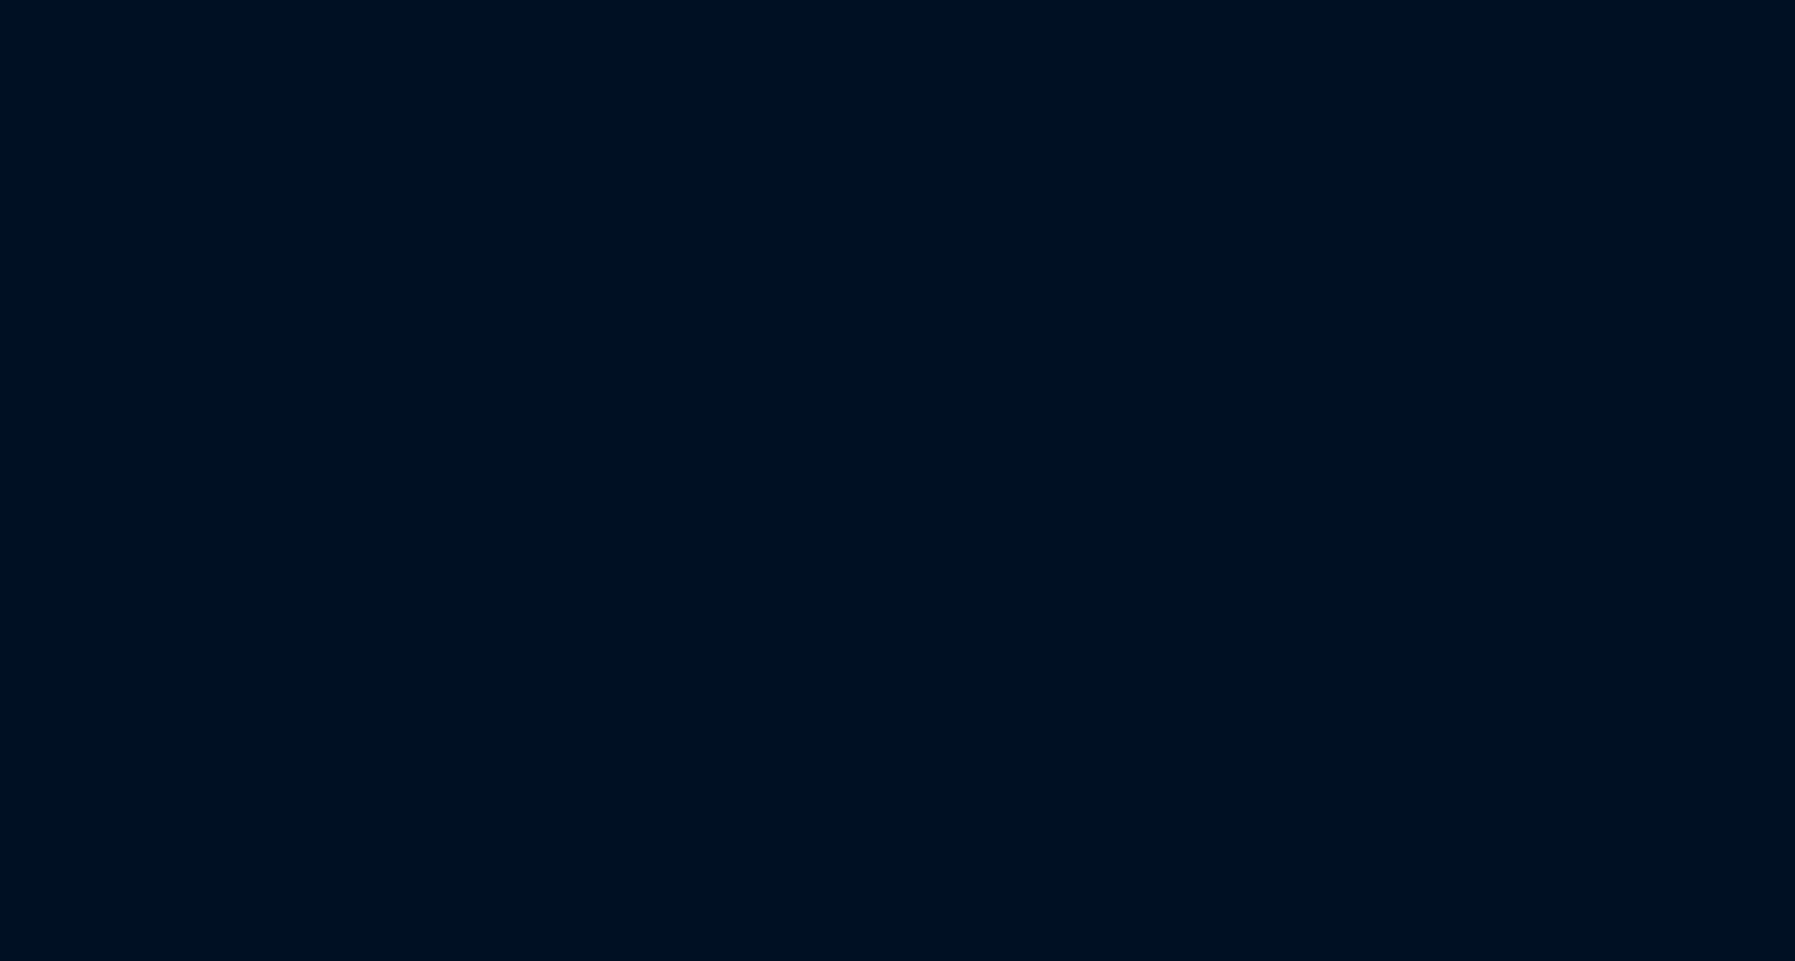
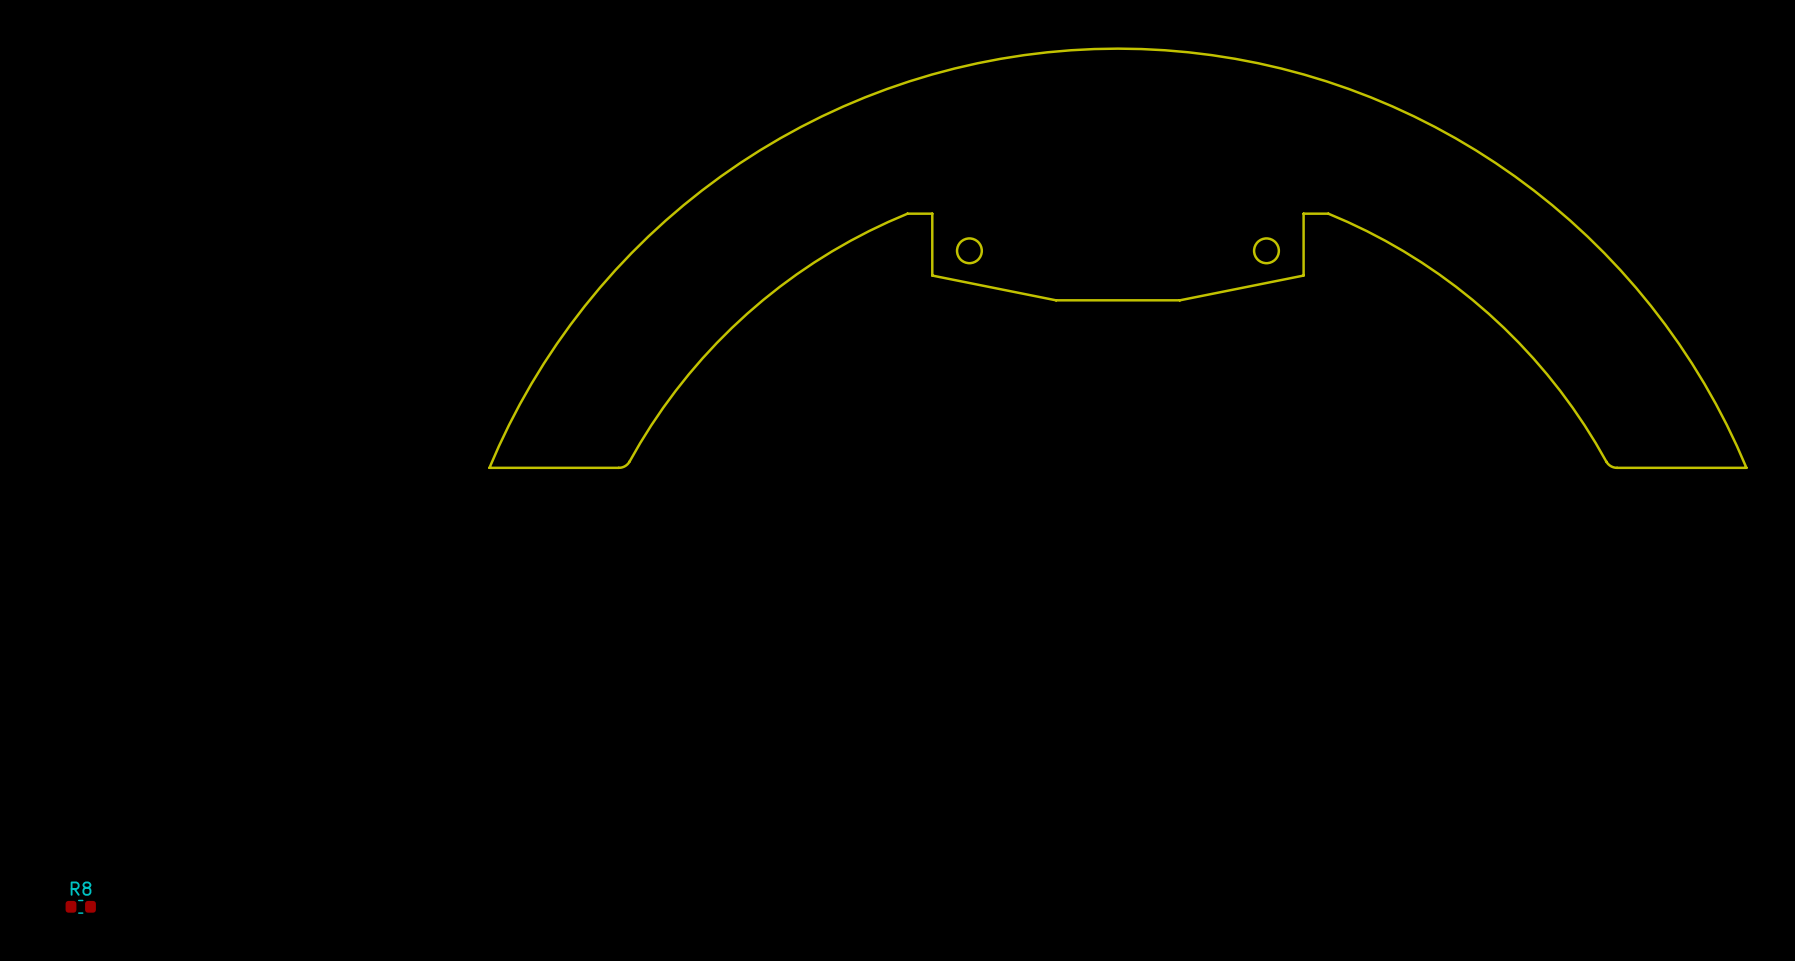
board edge: none -> (907, 213) (932, 213) (932, 275) (1056, 300) (1179, 300) (1303, 275) (1303, 213) (1328, 213) (1385, 240) (1421, 262) (1456, 286) (1488, 313) (1518, 342) (1547, 374) (1572, 407) (1610, 466) (1617, 467) (1746, 467) (1726, 425) (1704, 383) (1679, 343) (1636, 287) (1604, 253) (1570, 220) (1533, 190) (1495, 163) (1455, 138) (1413, 116) (1370, 97) (1326, 81) (1281, 68) (1235, 58) (1165, 50) (1117, 48) (1047, 52) (1000, 58) (954, 68) (909, 81) (865, 97) (821, 116) (780, 138) (740, 163) (701, 190) (665, 220) (631, 253) (599, 287) (570, 324) (531, 383) (509, 425) (489, 467) (618, 467) (625, 466) (663, 407) (688, 374) (716, 342) (747, 313) (779, 286) (814, 262) (850, 240) (907, 213)
round board edge: none -> [955, 237, 984, 265]
round board edge: none -> [1252, 237, 1281, 265]
R8: none -> (80, 906)

